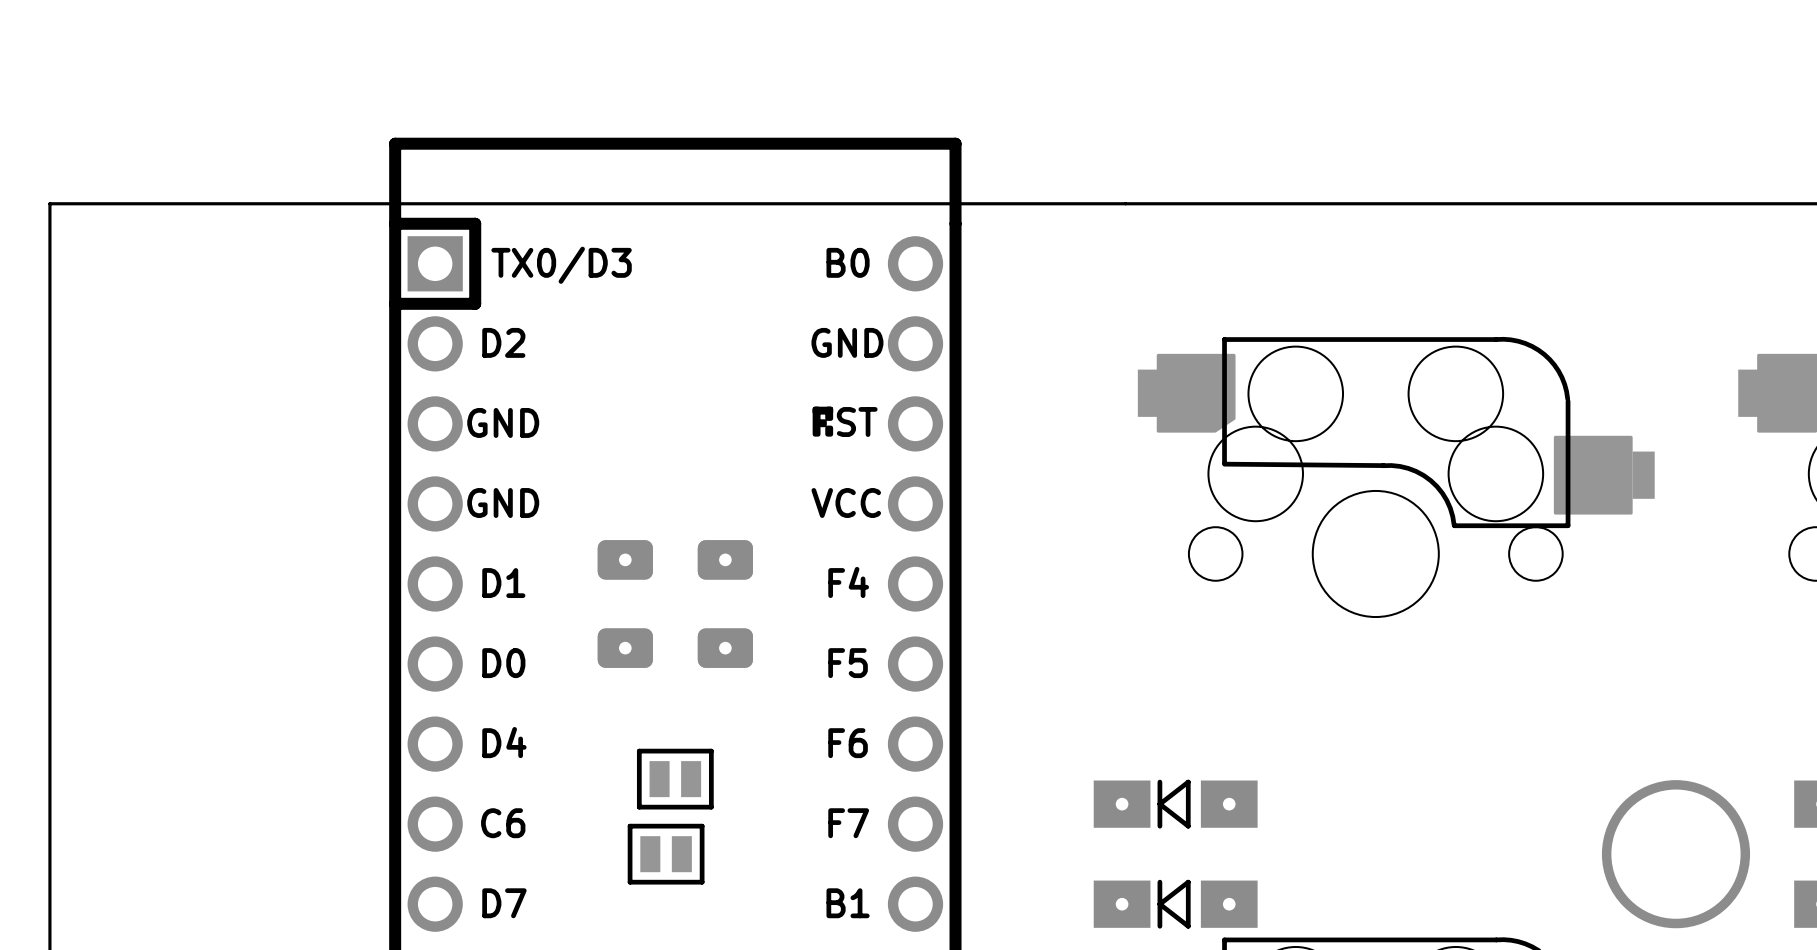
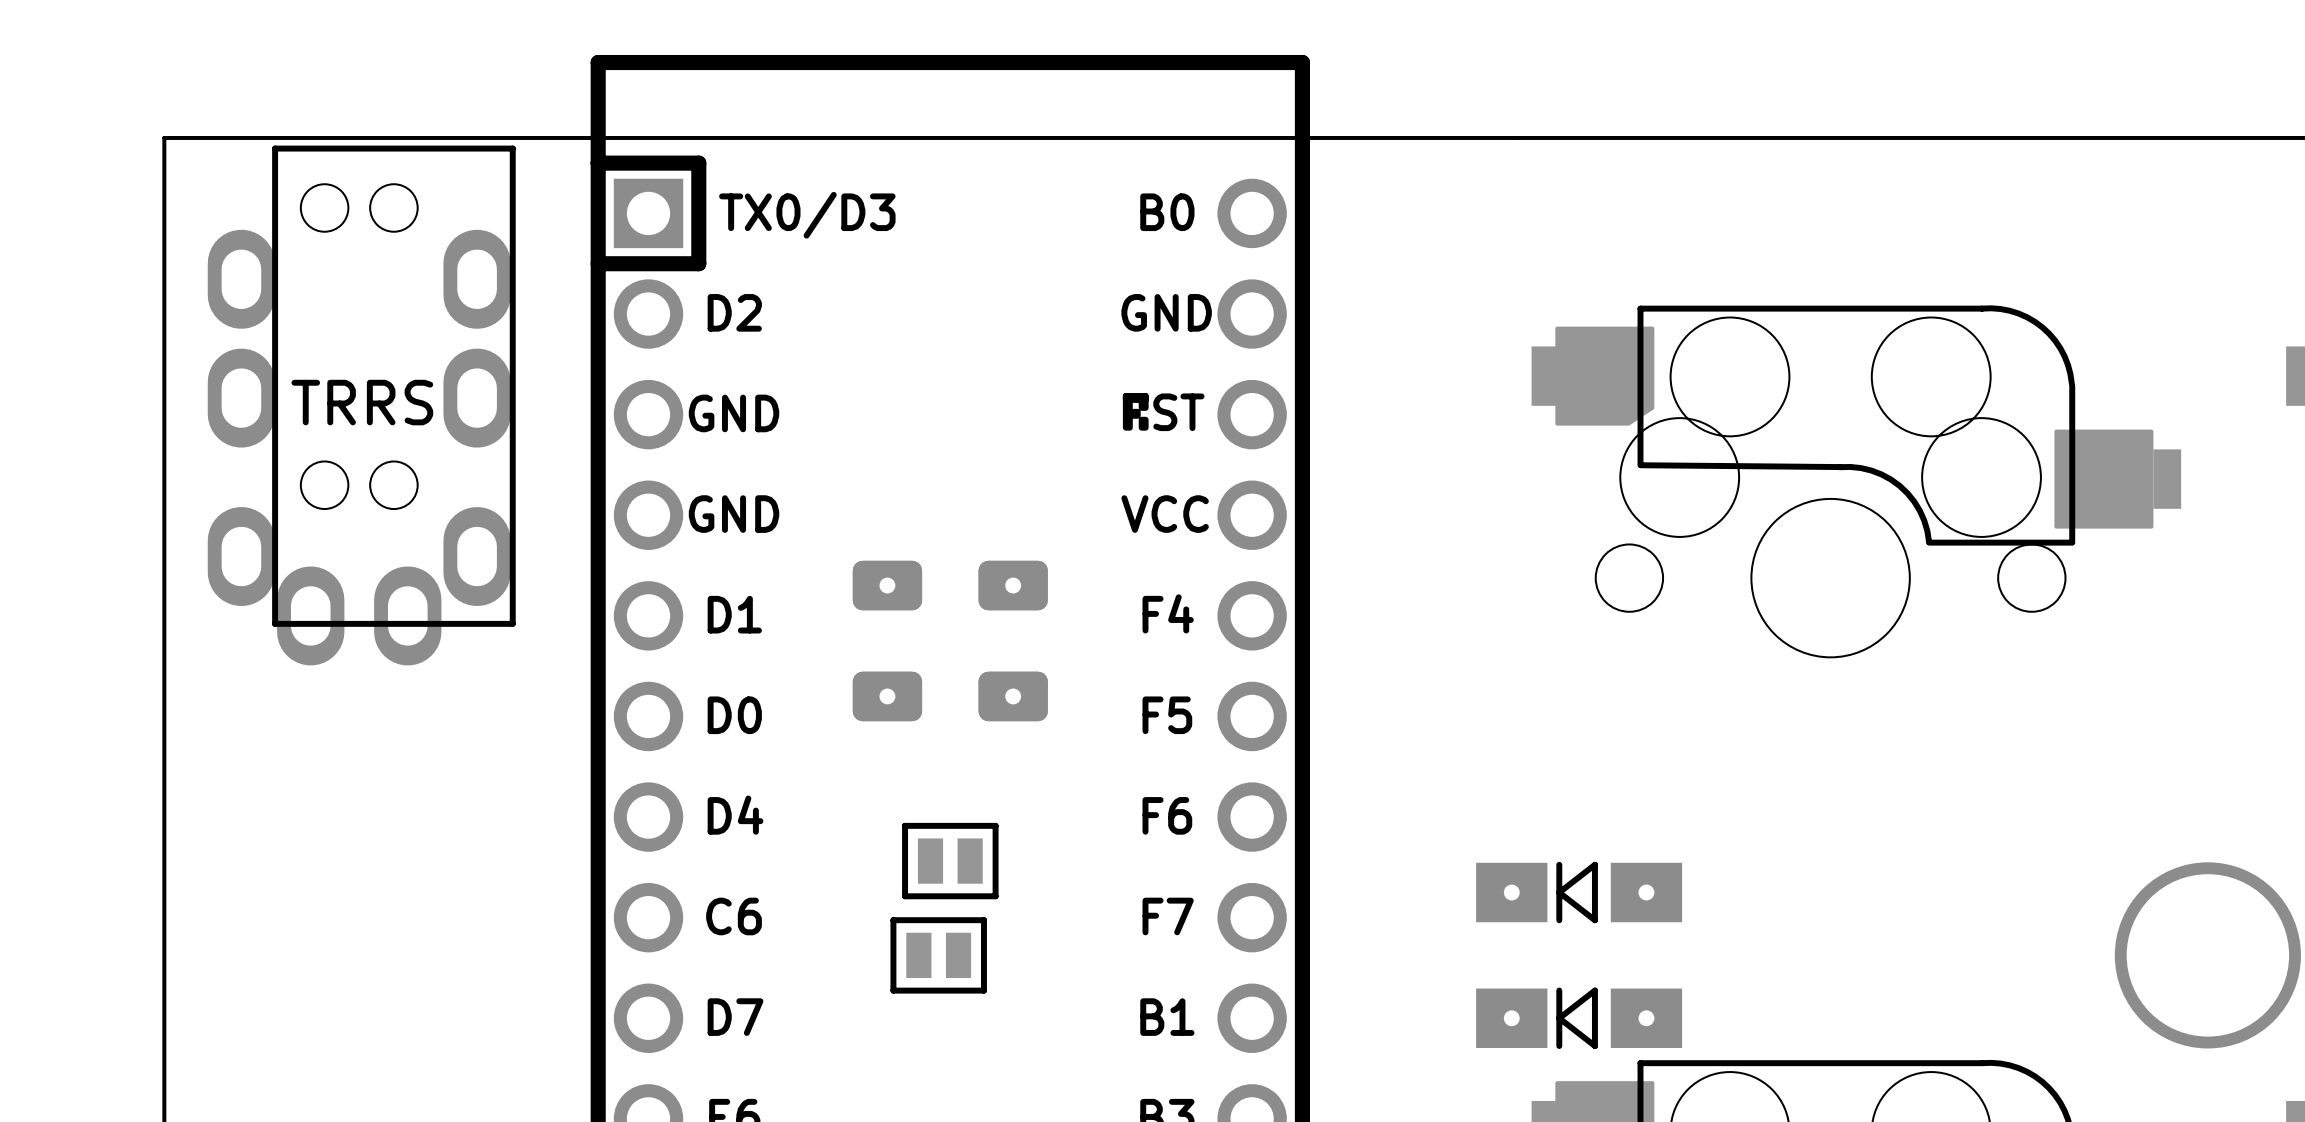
part: none -> (361, 405)

